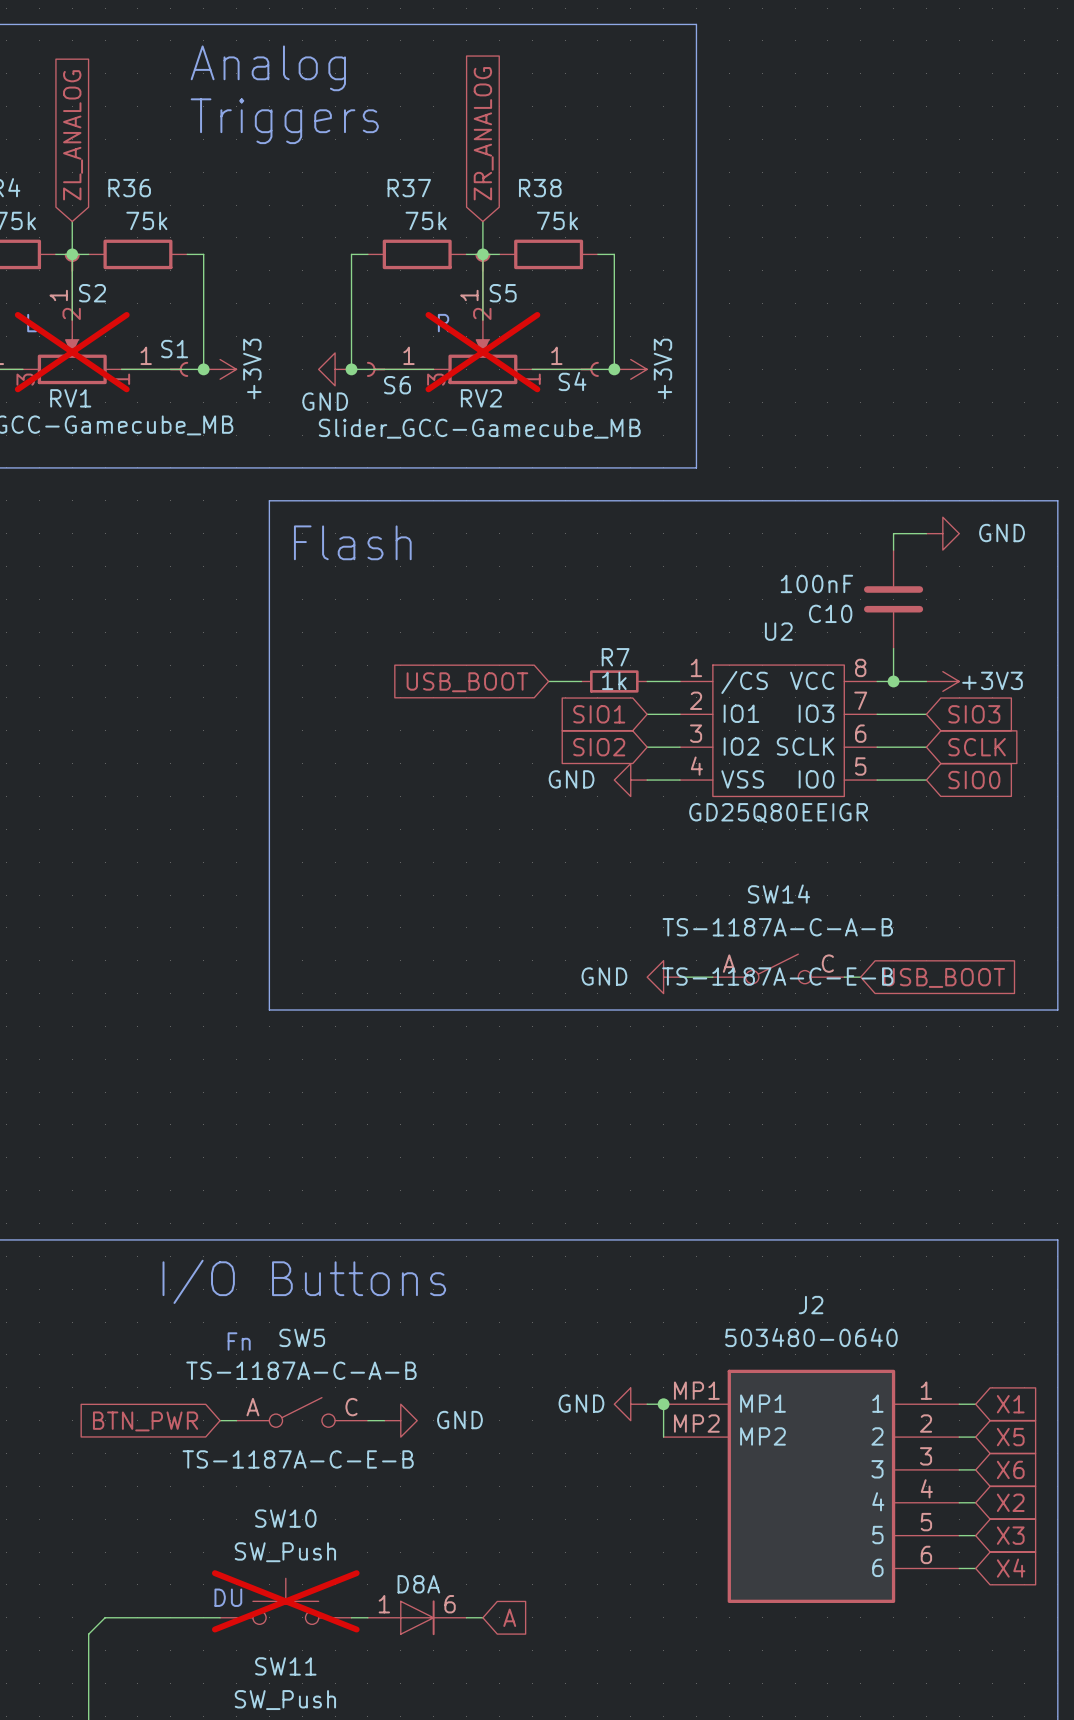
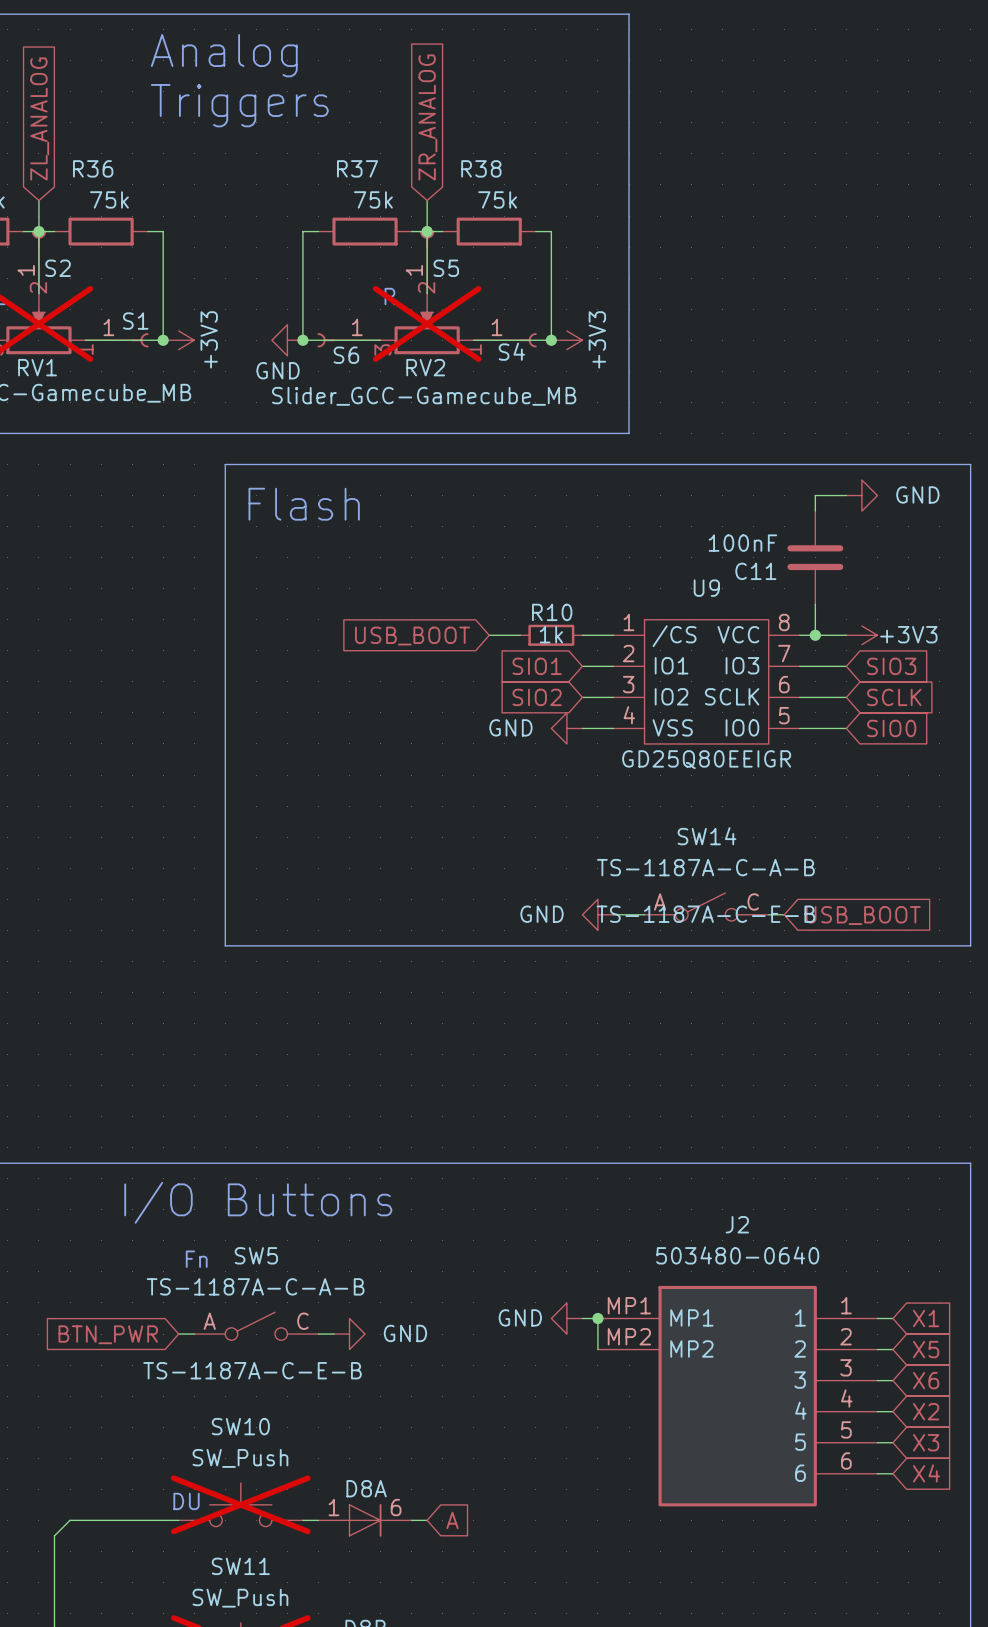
C10 name: C10 (830, 613) -> C11 (755, 571)
U2 name: U2 (778, 631) -> U9 (706, 588)
R7 name: R7 (615, 657) -> R10 (552, 612)

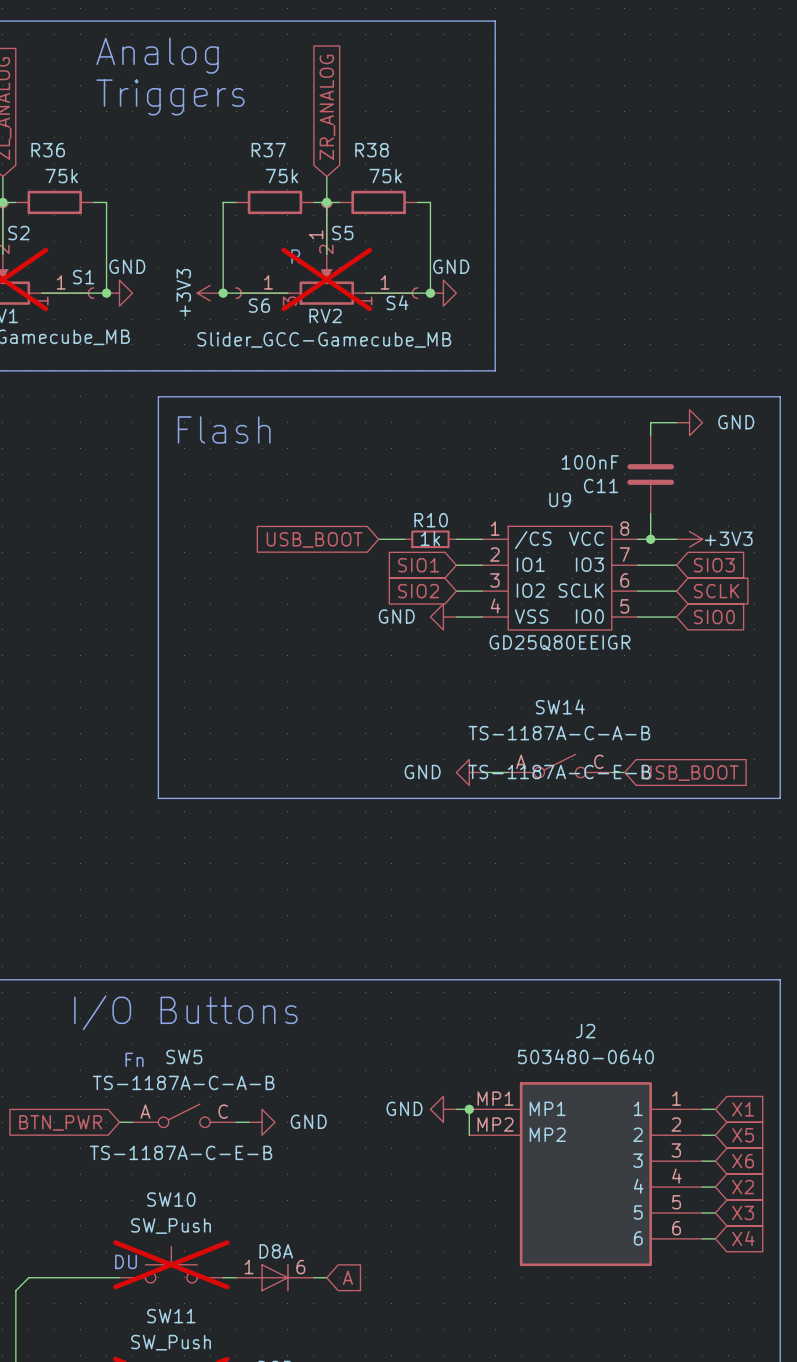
power symbol: +3V3 (178, 340) -> GND (119, 293)
power symbol: GND (287, 340) -> +3V3 (210, 293)
power symbol: +3V3 (566, 340) -> GND (443, 293)

